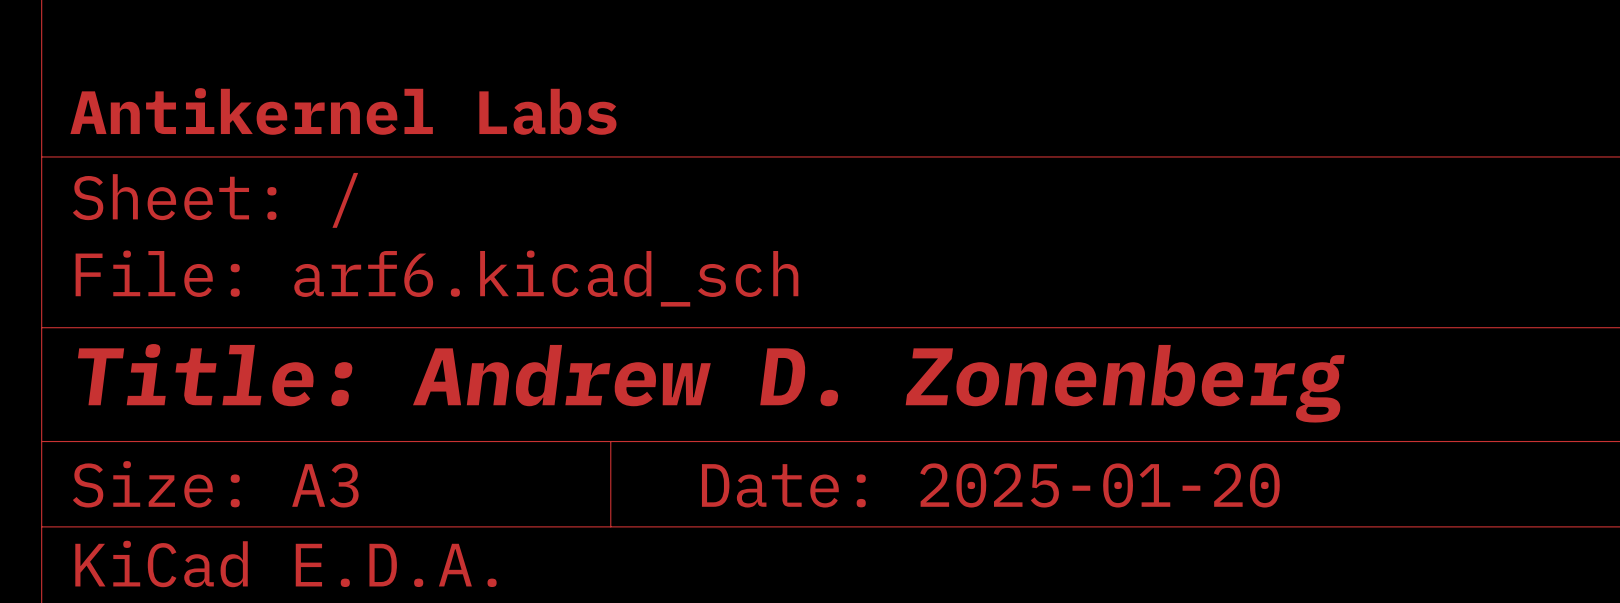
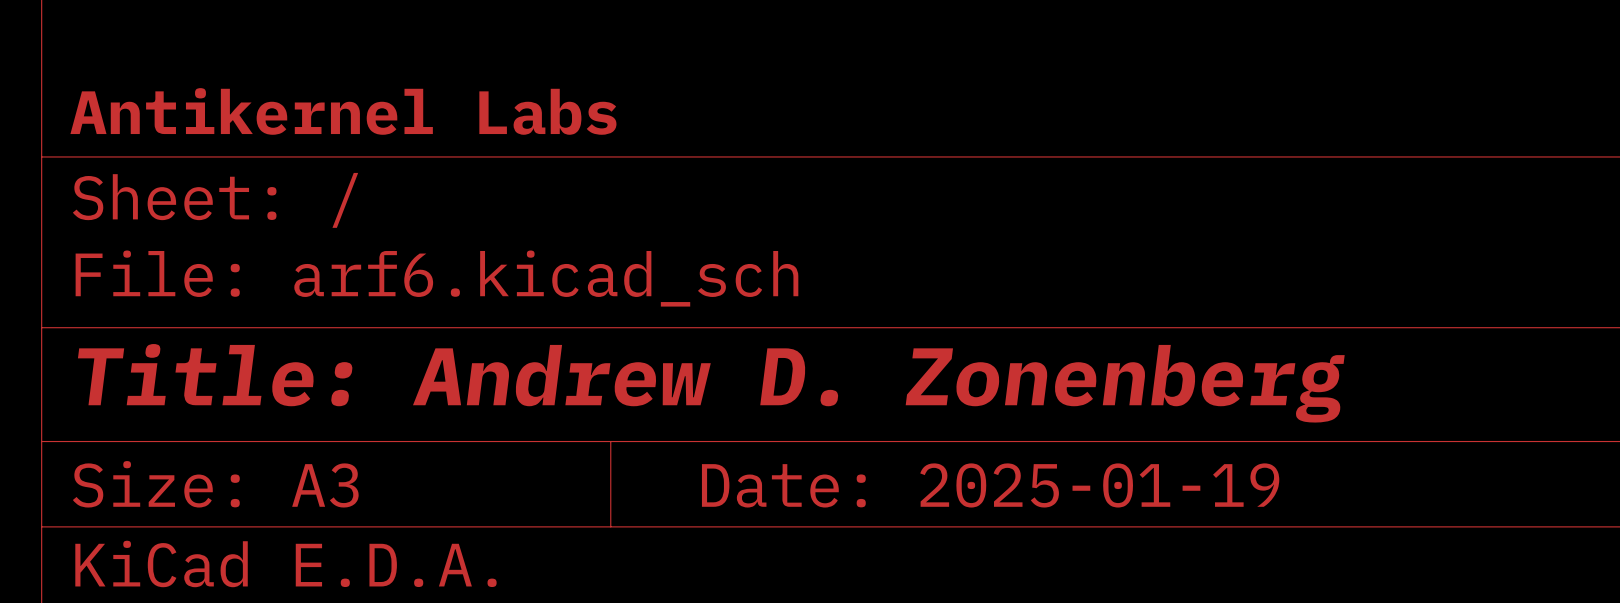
title block: Date: 2025-01-20 (990, 485) -> Date: 2025-01-19 (990, 485)

